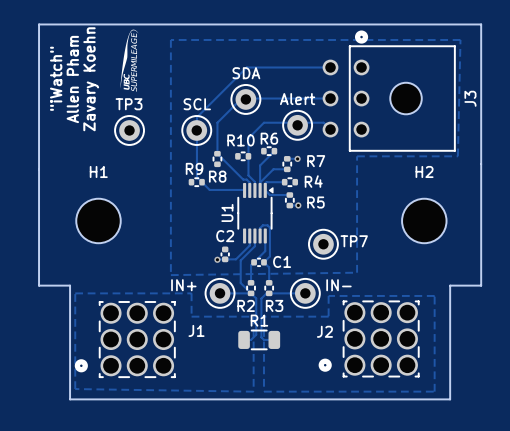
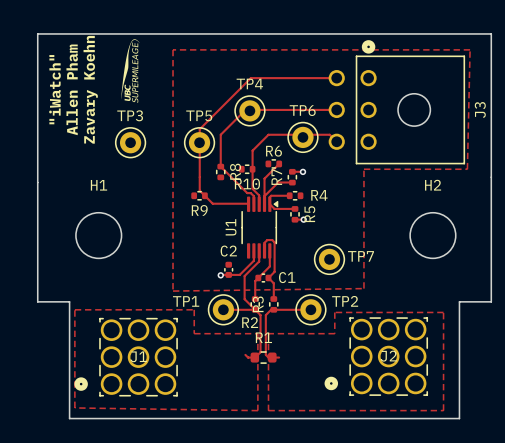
SDA name: SDA (246, 73) -> TP4 (249, 83)
Alert name: Alert (297, 99) -> TP6 (302, 110)
SCL name: SCL (197, 104) -> TP5 (199, 115)
R10 name position: R10 (240, 140) -> R10 (247, 184)
R7 name rotation: 0° (316, 161) -> 90° counterclockwise (276, 177)
R7 name position: R7 (316, 161) -> R7 (276, 177)
R9 name position: R9 (194, 168) -> R9 (199, 210)
R8 name rotation: 0° (217, 176) -> 90° counterclockwise (235, 171)
R5 name rotation: 0° (315, 202) -> 90° counterclockwise (309, 214)
IN+ name: IN+ (183, 285) -> TP1 (186, 301)
IN- name: IN- (338, 285) -> TP2 (345, 301)
R3 name rotation: 0° (274, 305) -> 90° counterclockwise (258, 304)
R3 name position: R3 (274, 305) -> R3 (258, 304)
R1 footprint: [238, 329, 281, 350] -> [250, 351, 277, 364]
J1 name position: J1 (196, 330) -> J1 (138, 356)
J2 name position: J2 (324, 331) -> J2 (388, 356)

